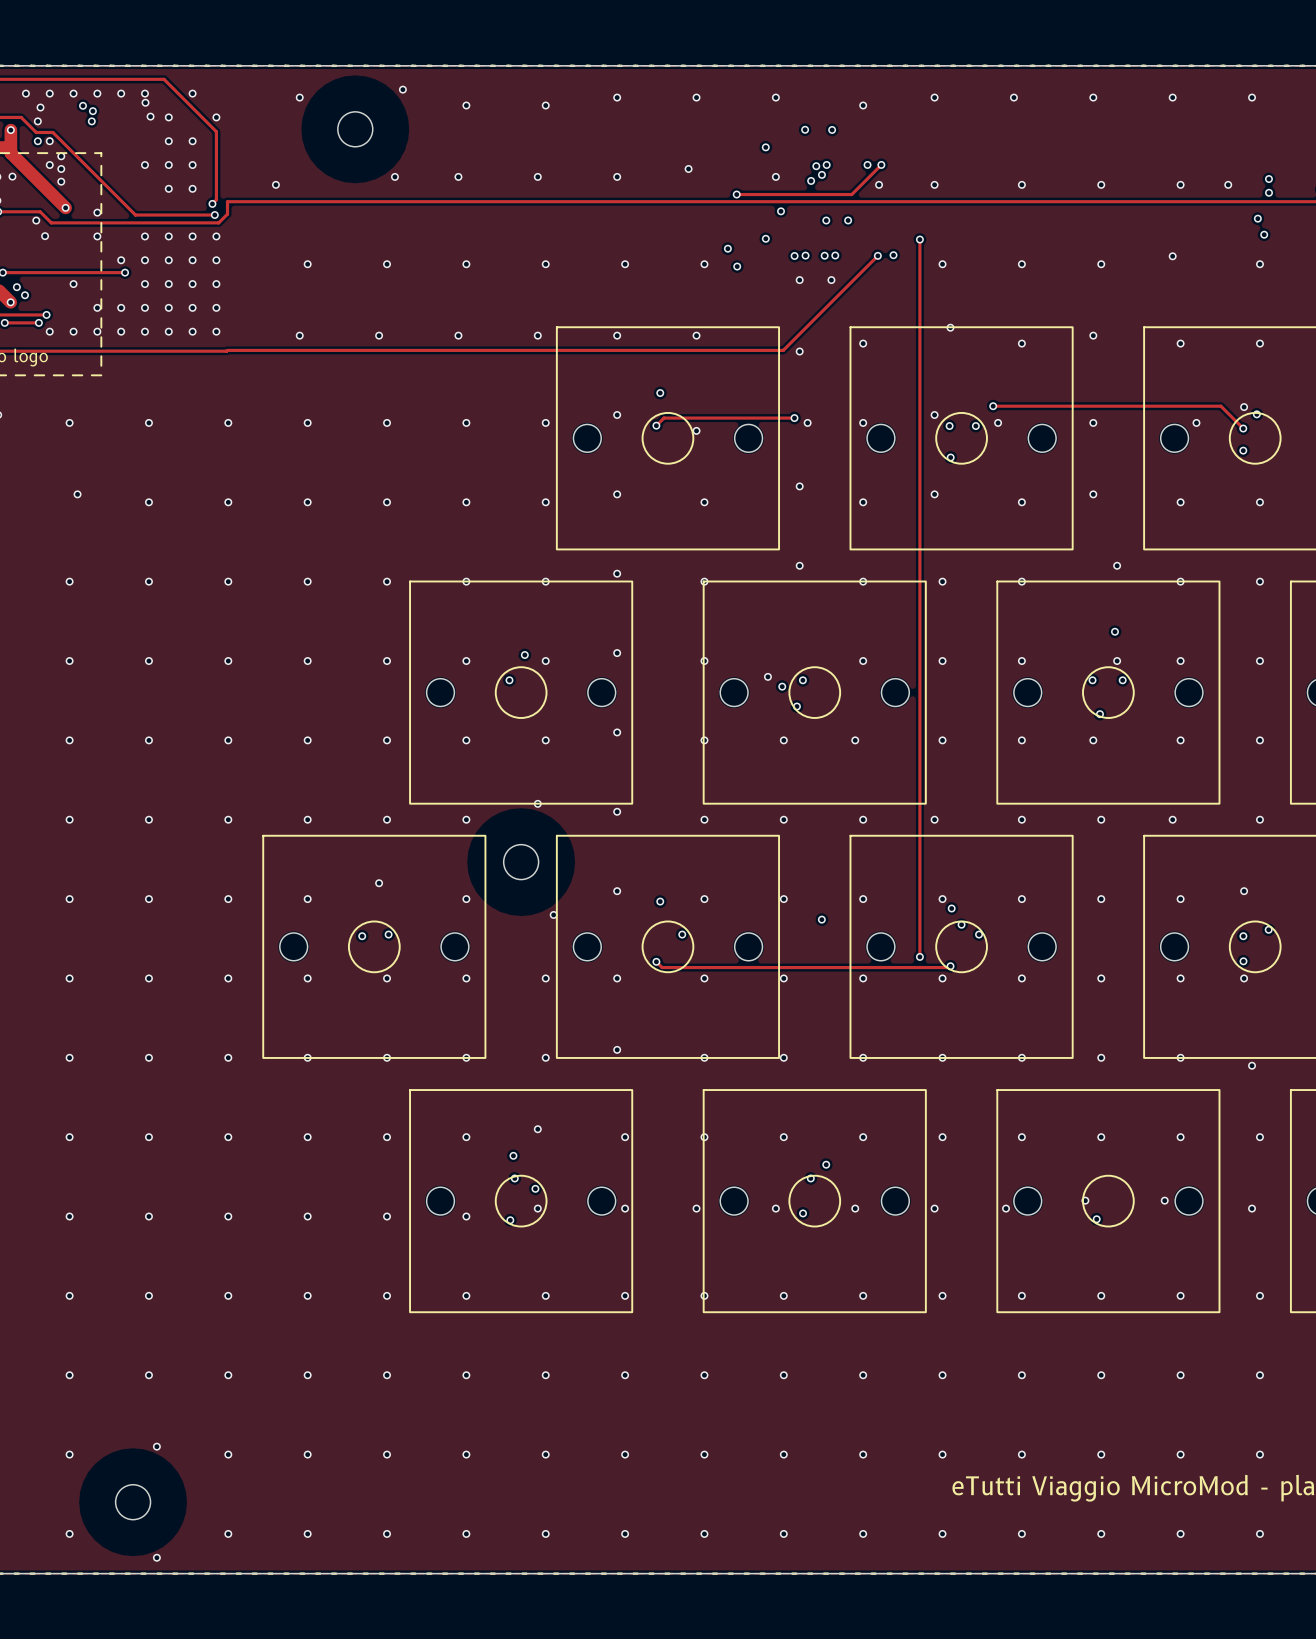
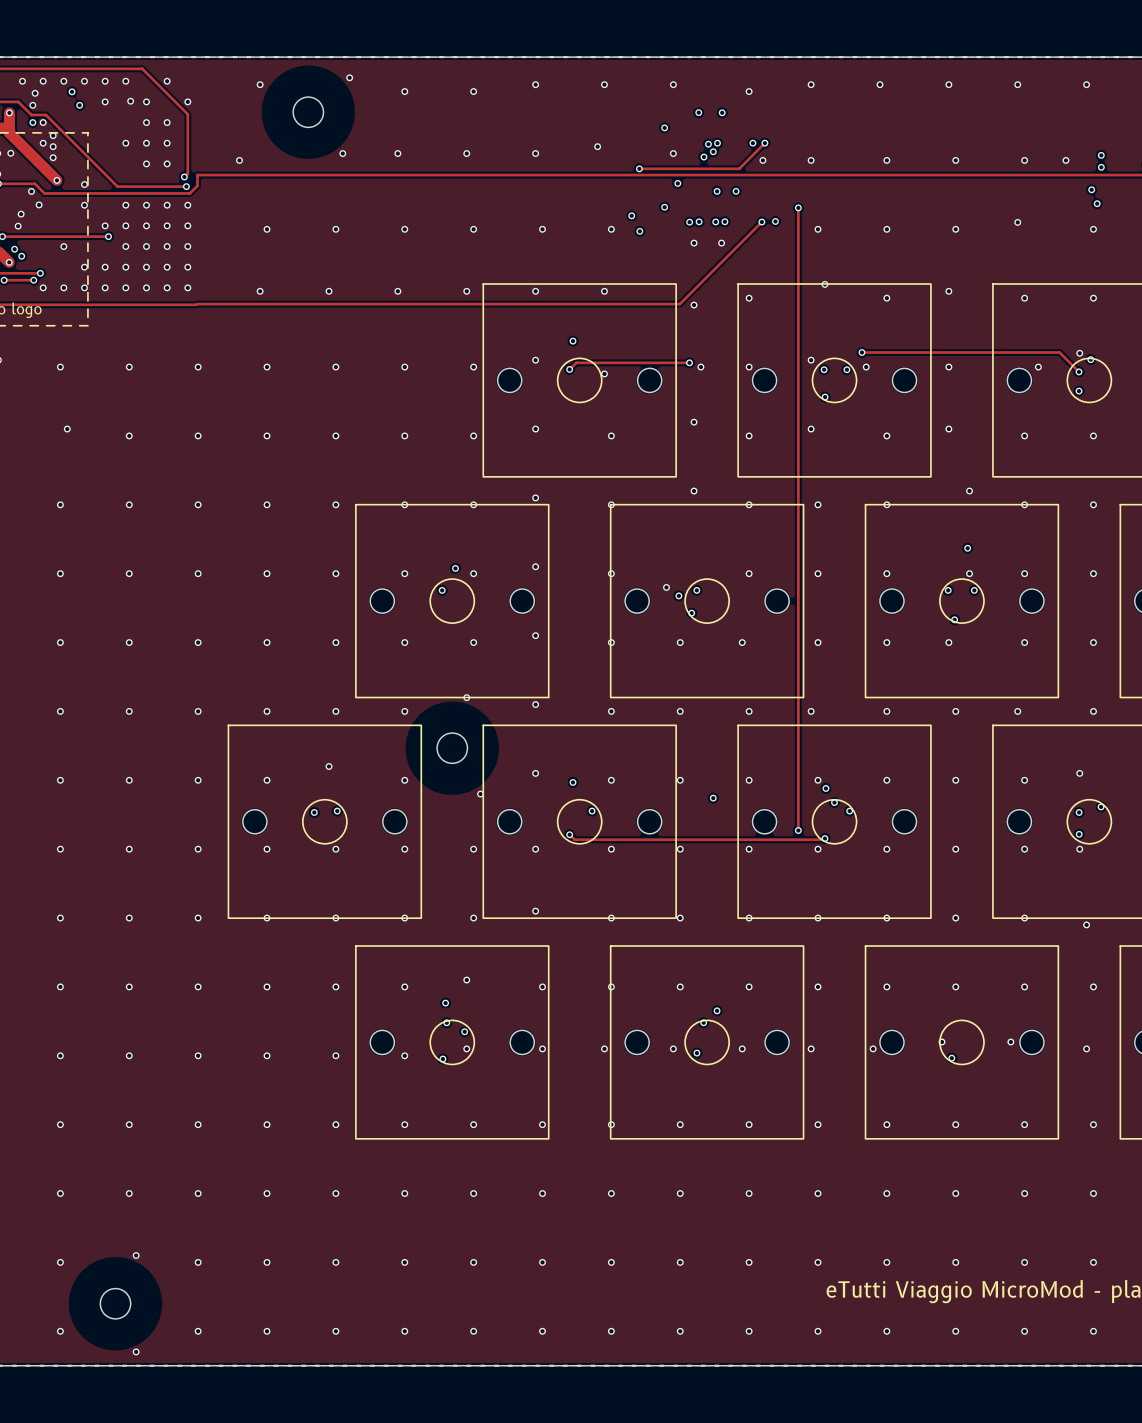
via: (145, 102) -> none
via: (92, 111) -> none
via: none -> (105, 101)
via: none -> (21, 214)
via: none -> (18, 226)

